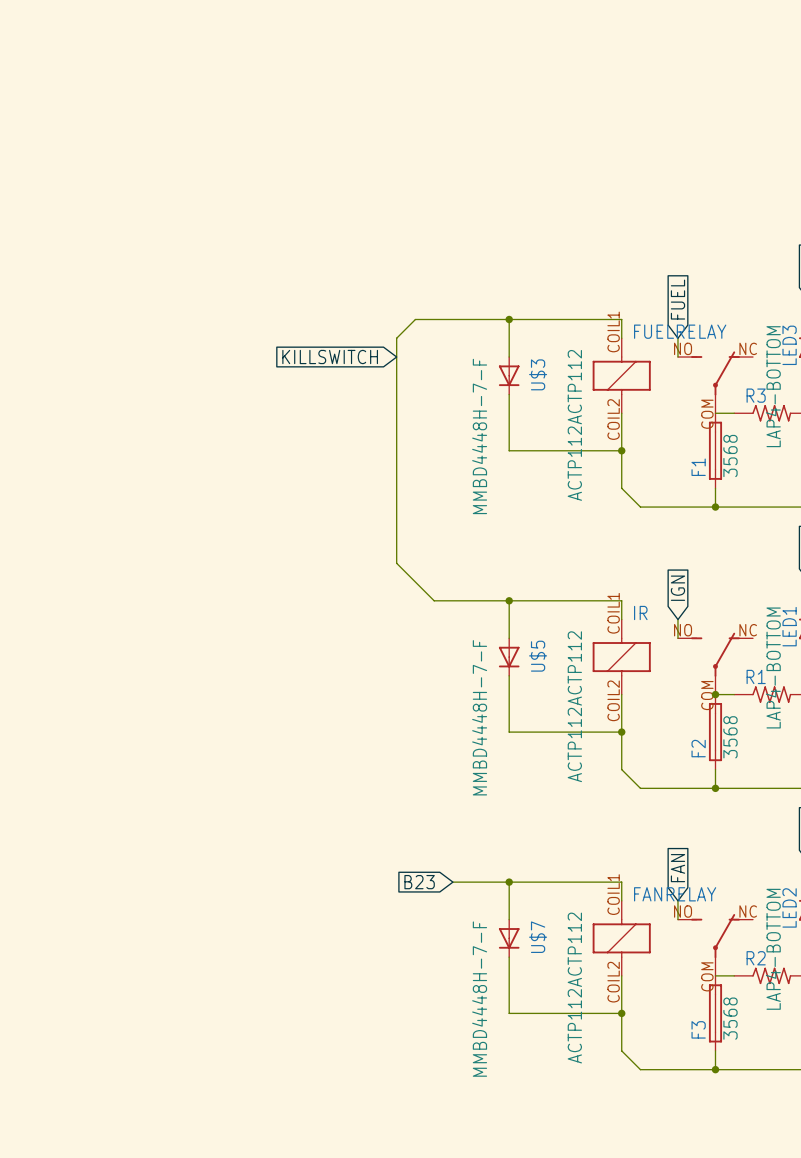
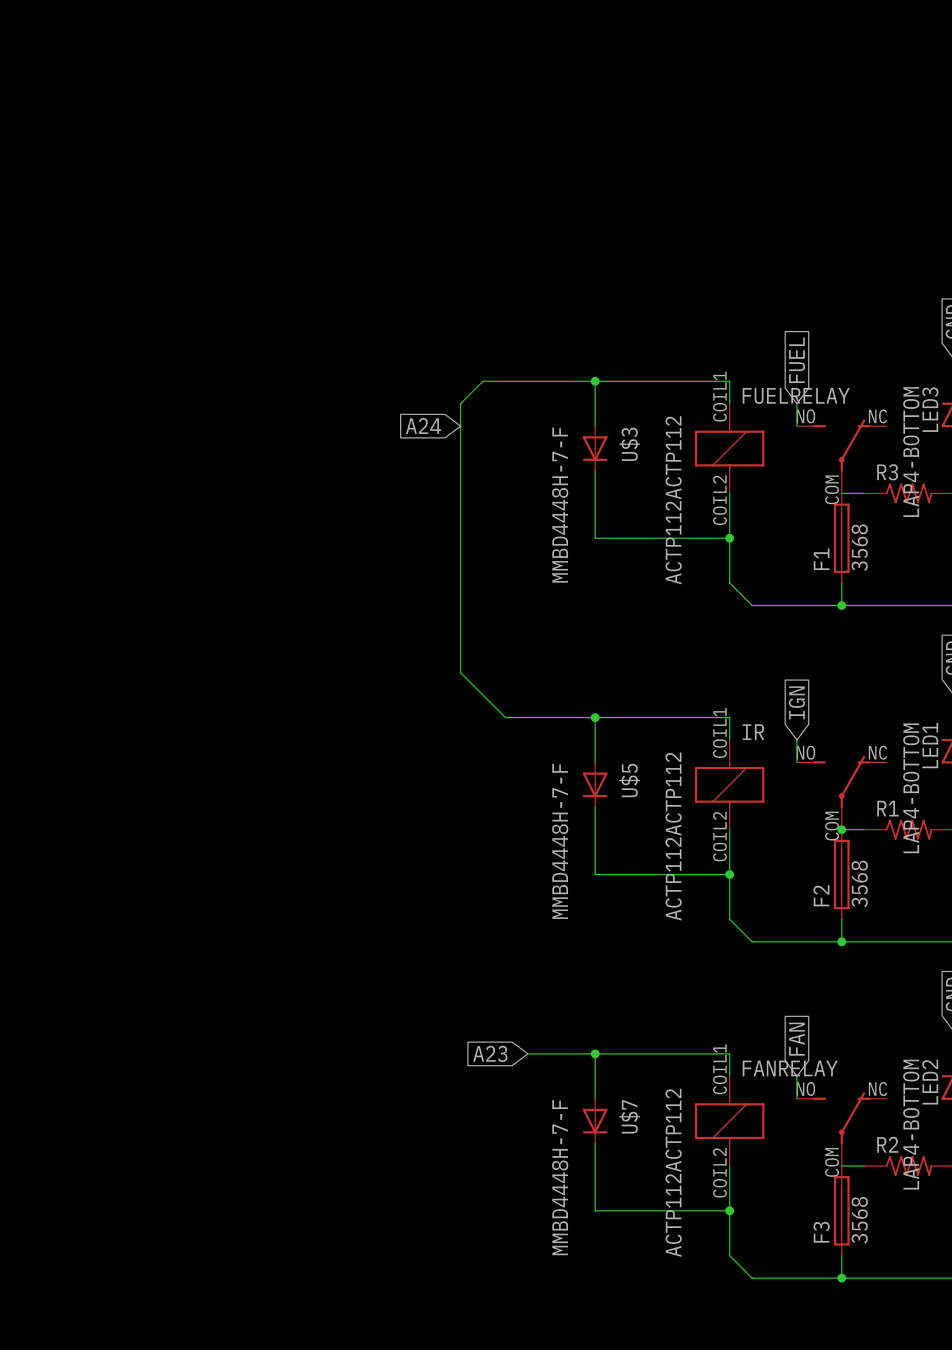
global label: KILLSWITCH (330, 357) -> A24 (423, 425)
global label: B23 (419, 882) -> A23 (490, 1053)

